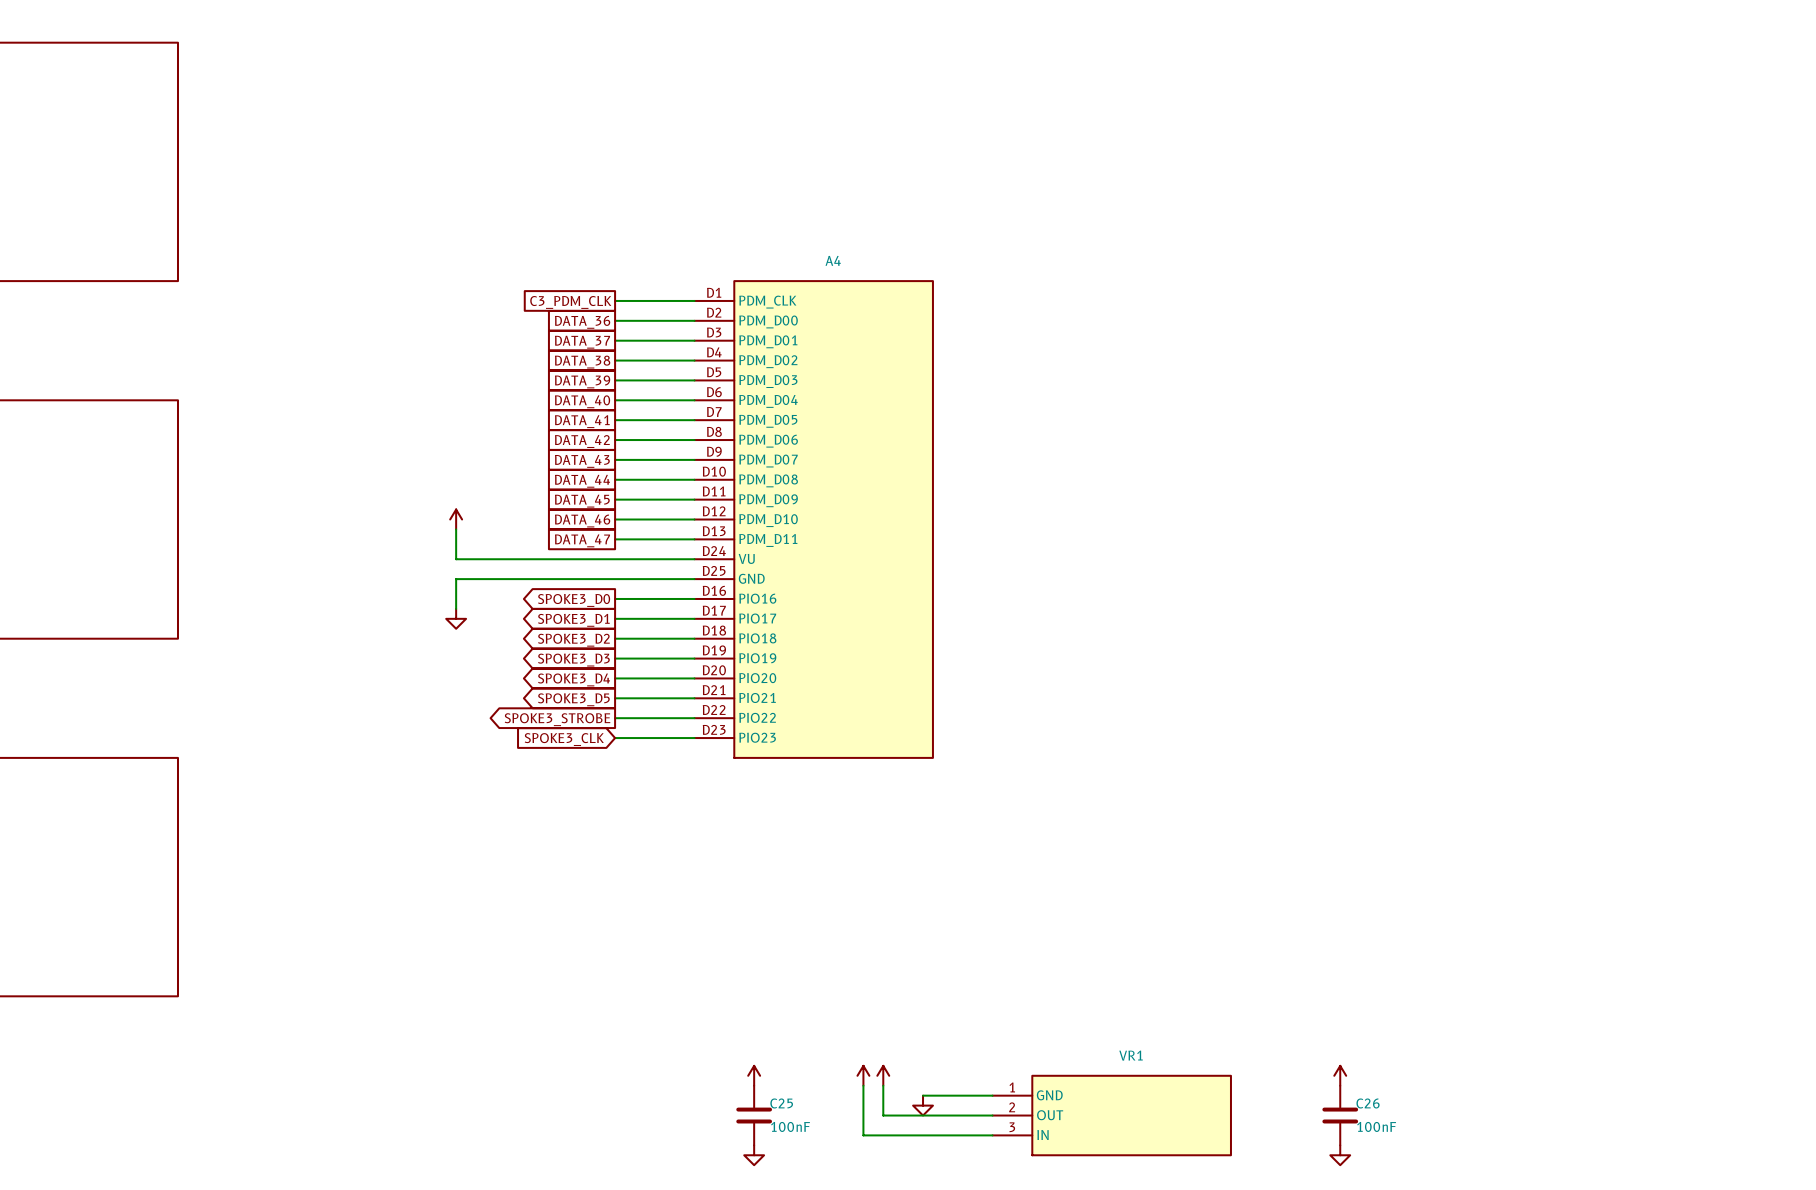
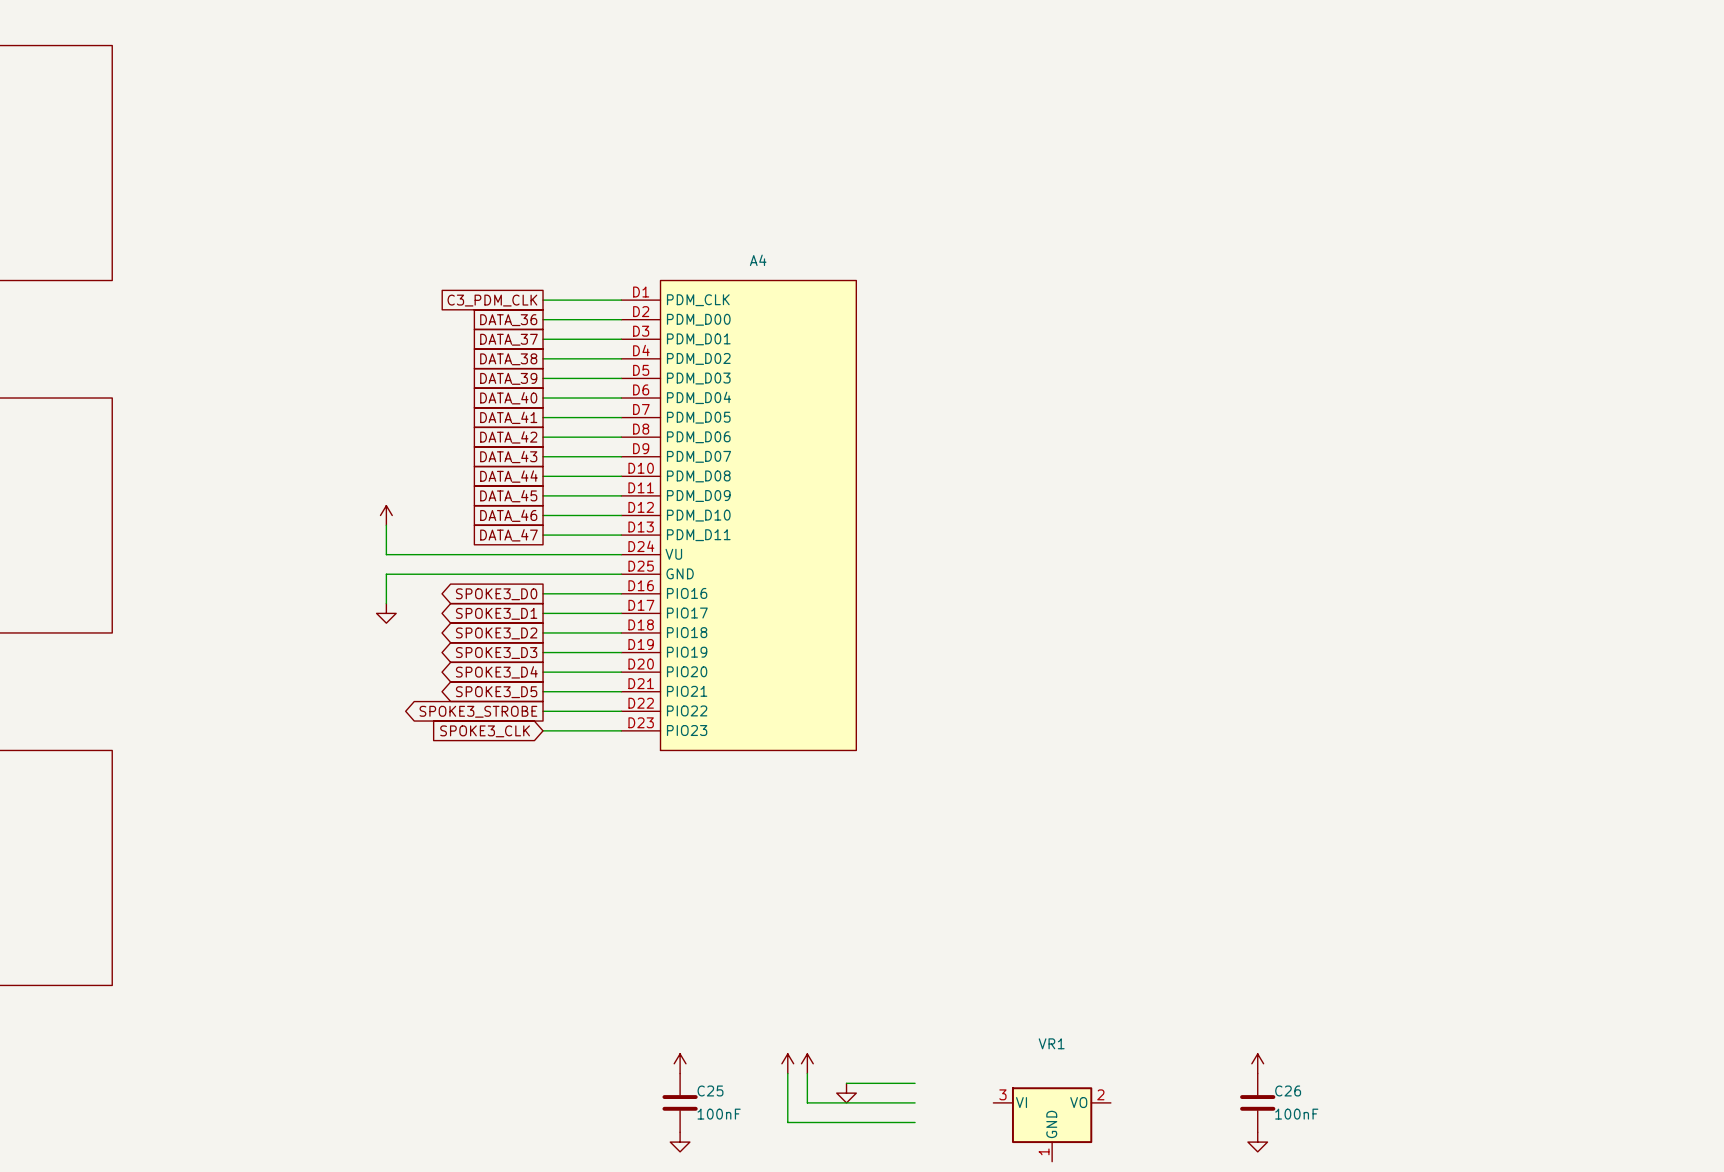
VR1 symbol: [992, 1075, 1231, 1156] -> [993, 1087, 1111, 1162]

